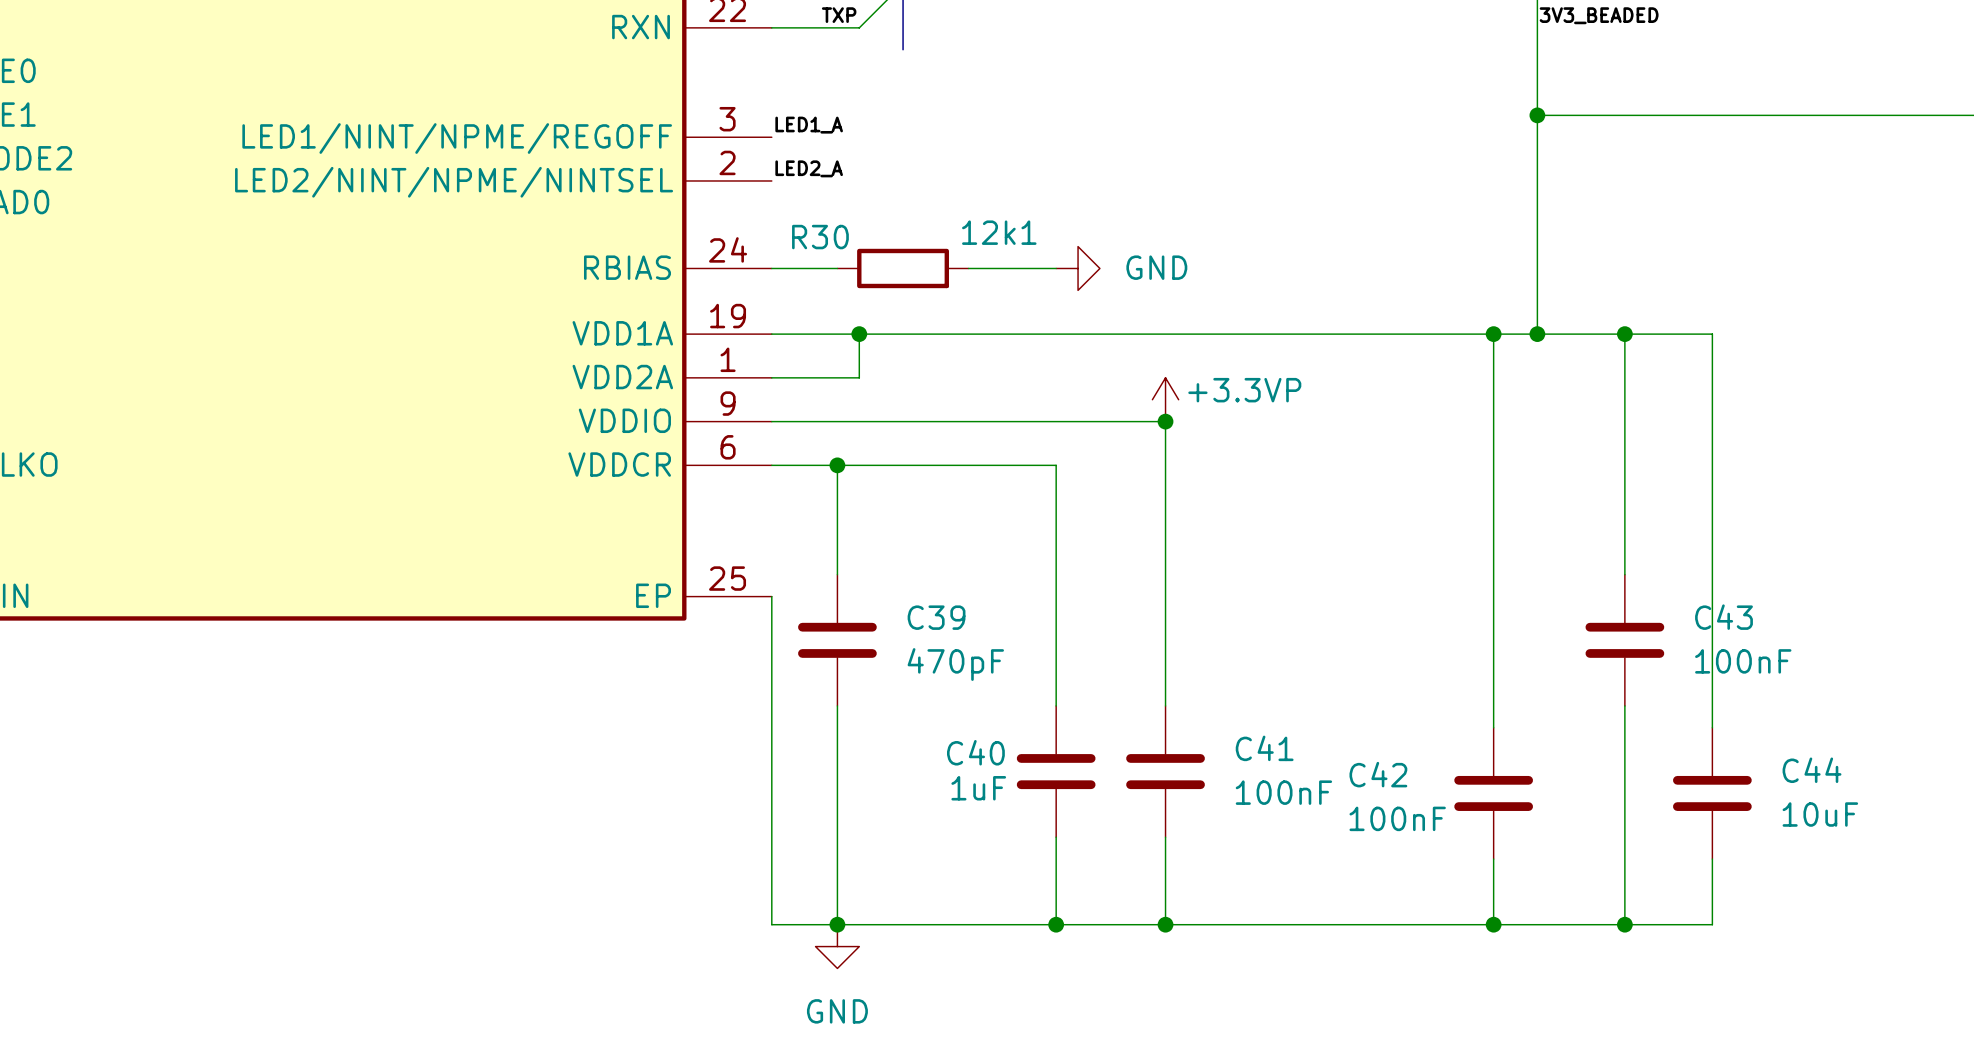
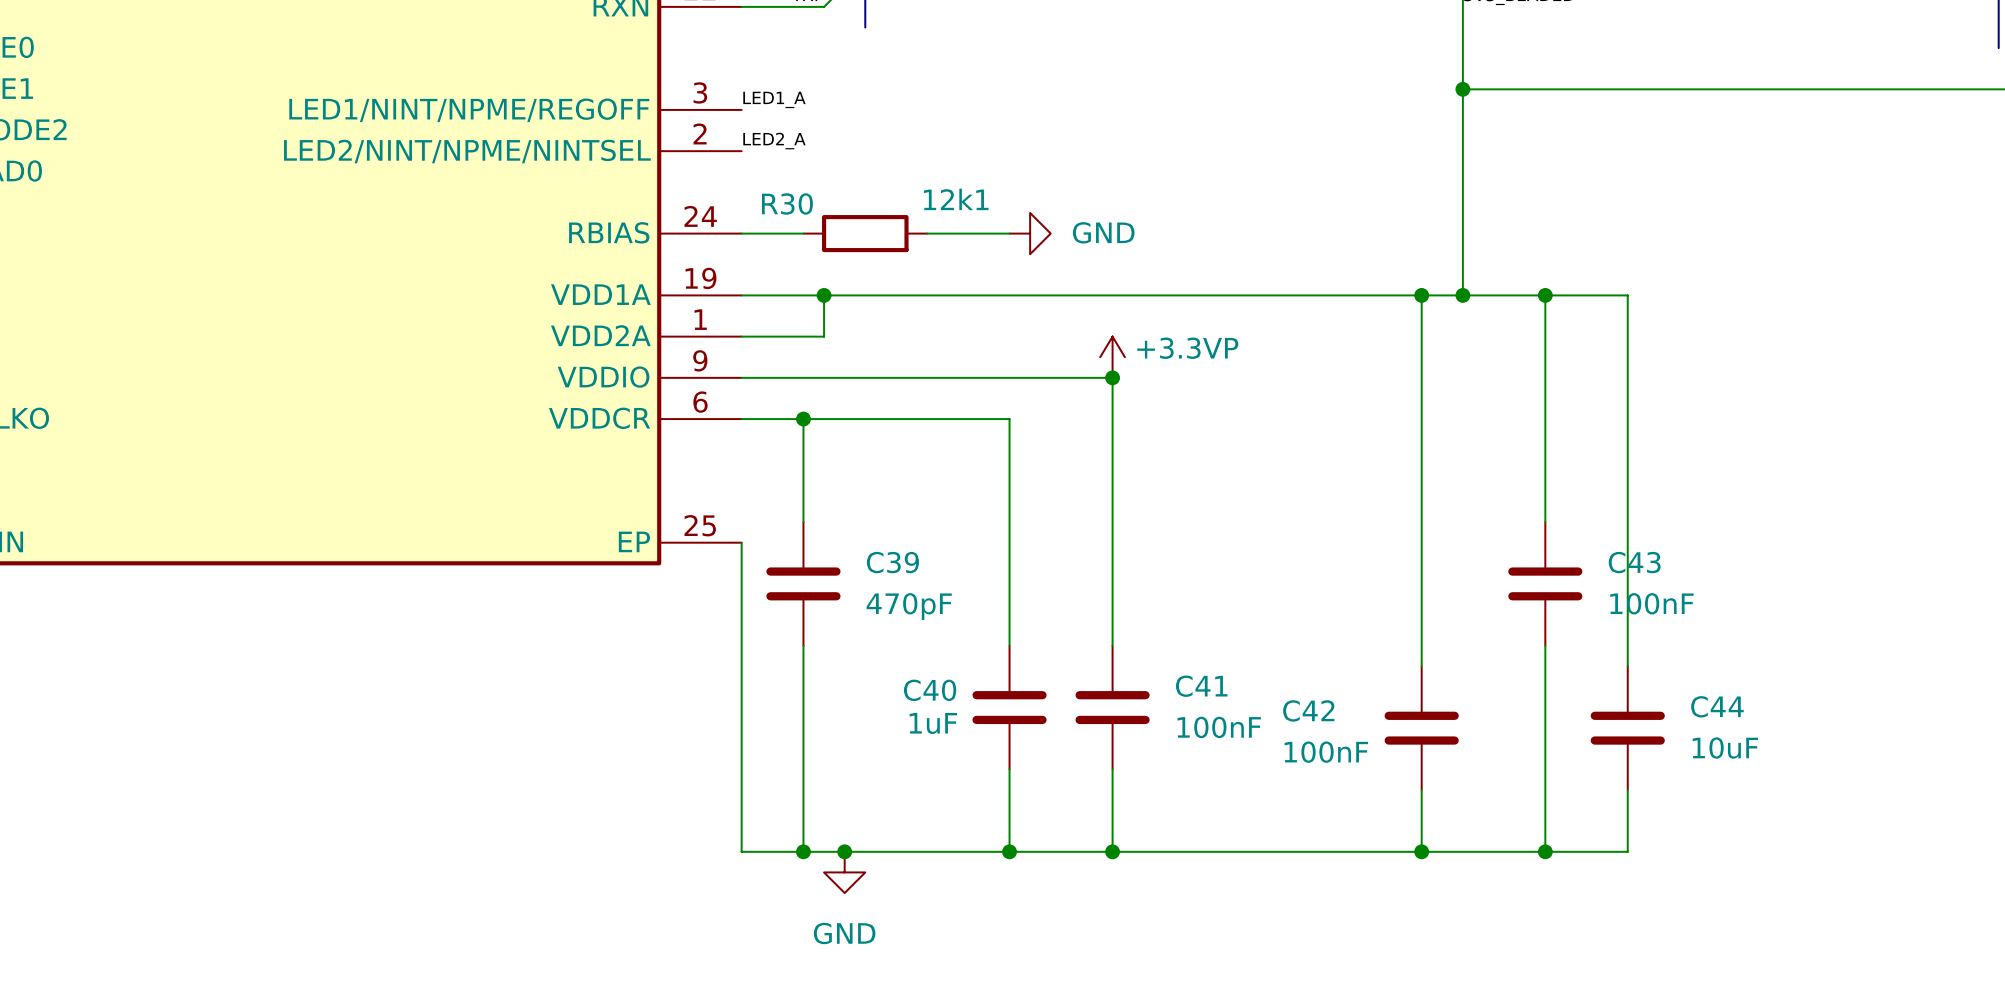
junction: none -> (844, 851)
power symbol position: GND (837, 946) -> GND (844, 872)

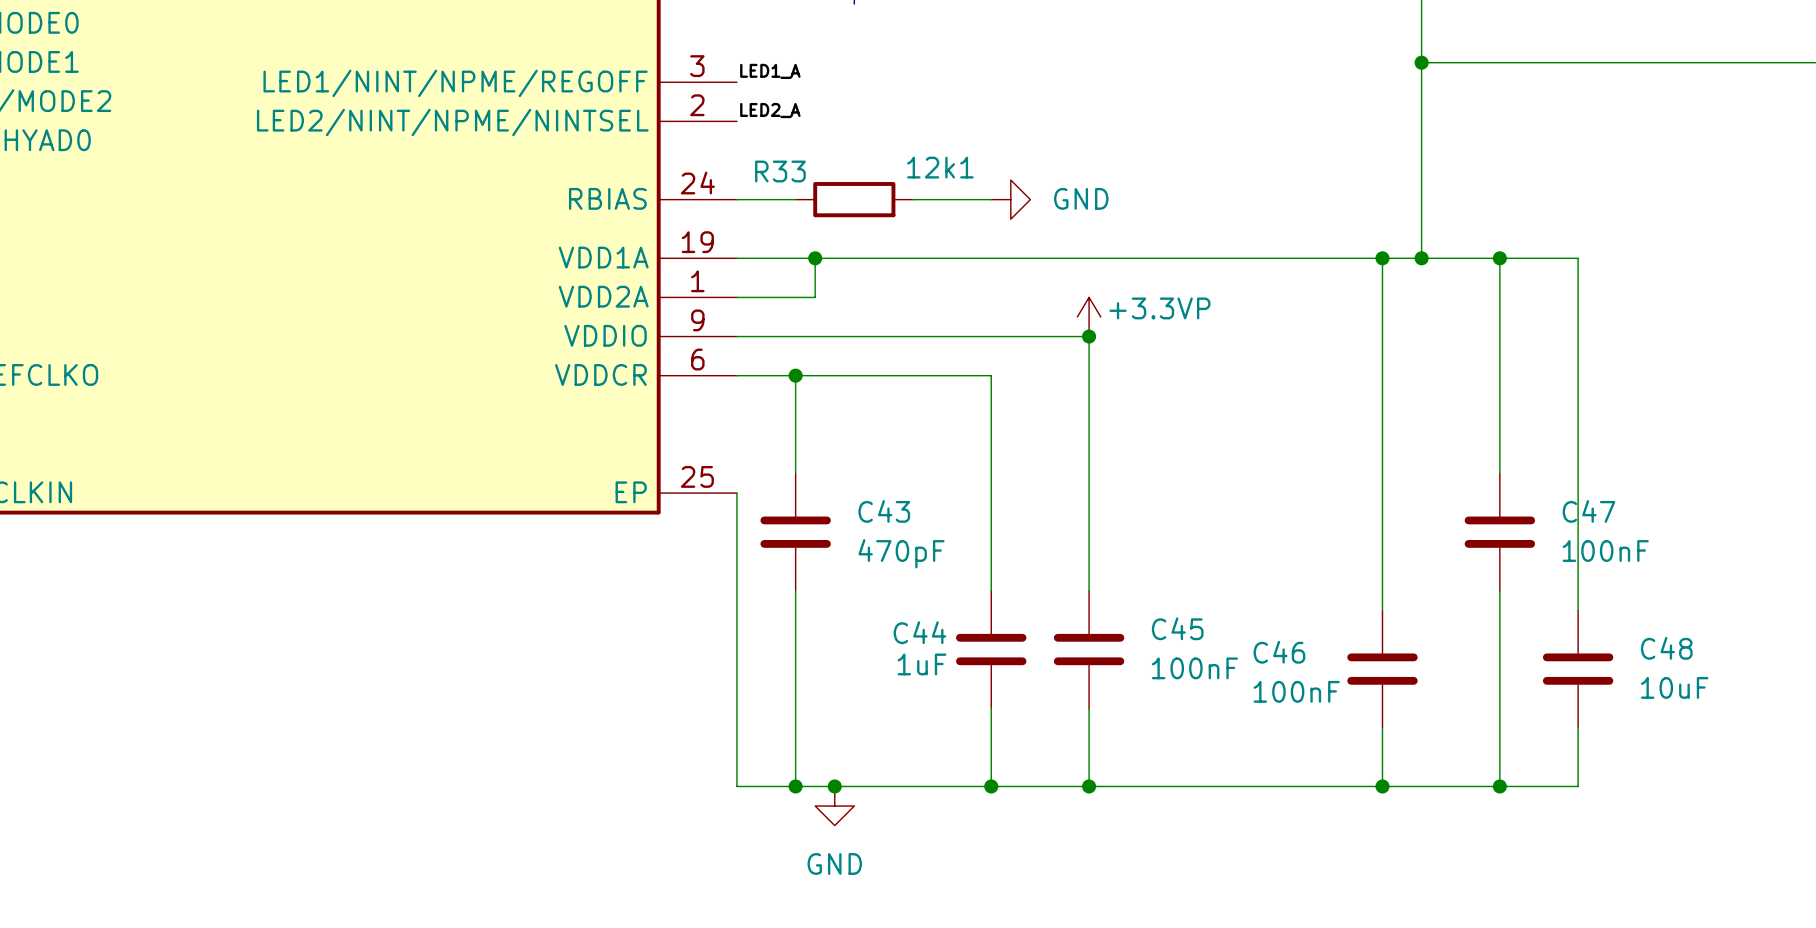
R30 name: R30 (787, 203) -> R33 (780, 171)
C39 name: C39 (892, 562) -> C43 (884, 511)
C43 name: C43 (1634, 562) -> C47 (1588, 511)
C41 name: C41 (1201, 686) -> C45 (1177, 628)
C40 name: C40 (930, 690) -> C44 (919, 632)
C44 name: C44 (1717, 706) -> C48 (1666, 648)
C42 name: C42 (1308, 710) -> C46 (1279, 652)

